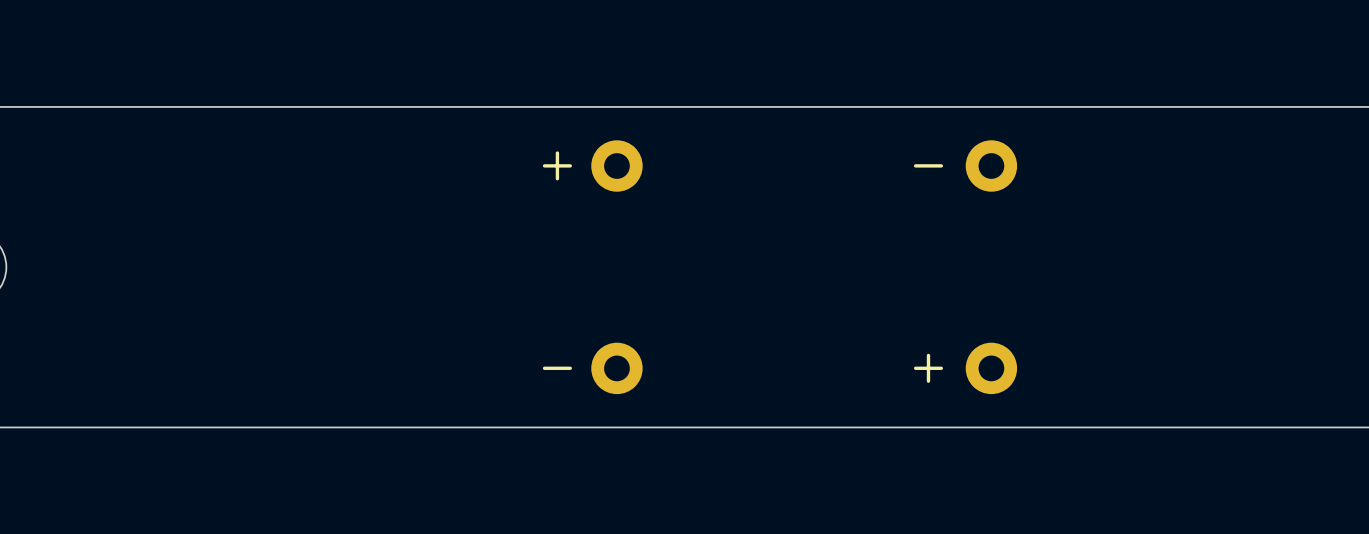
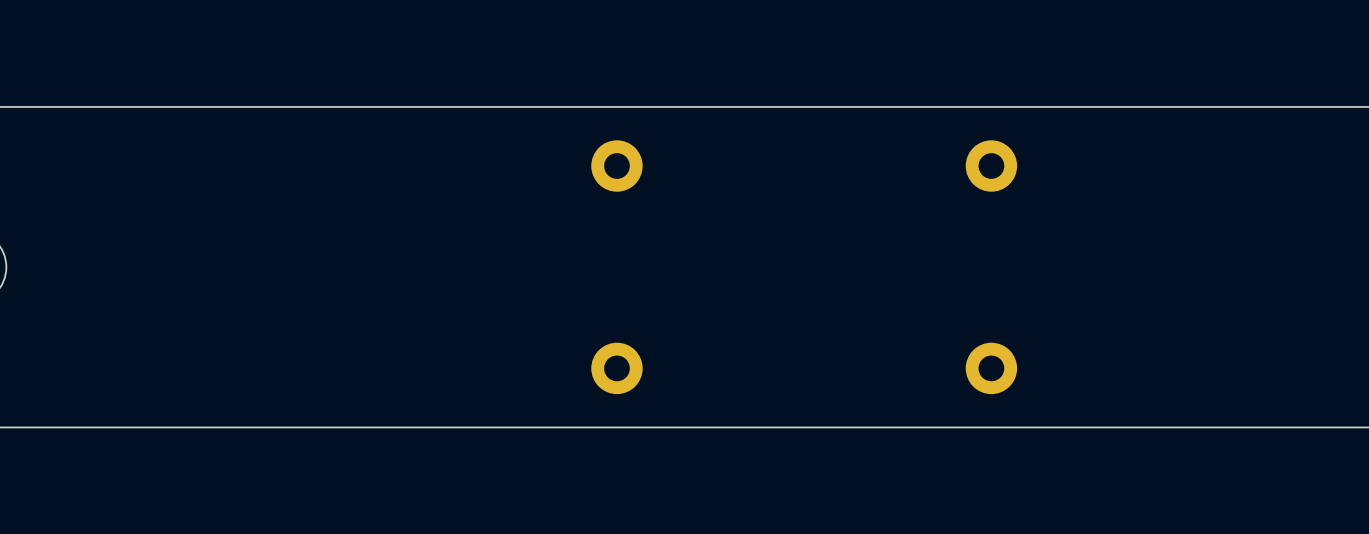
text: + (557, 165) -> none
text: - (928, 165) -> none
text: - (557, 368) -> none
text: + (928, 368) -> none

